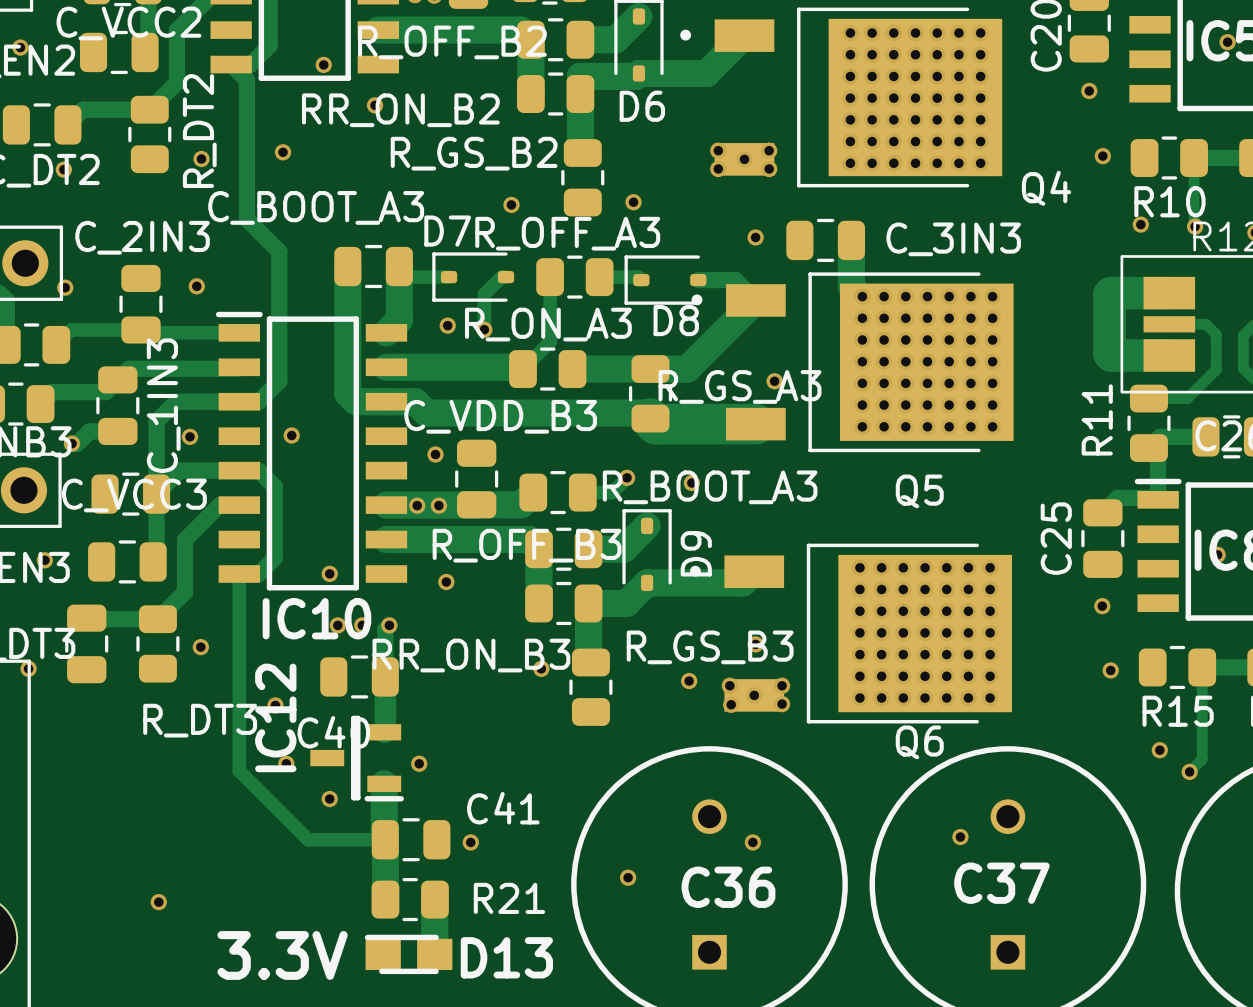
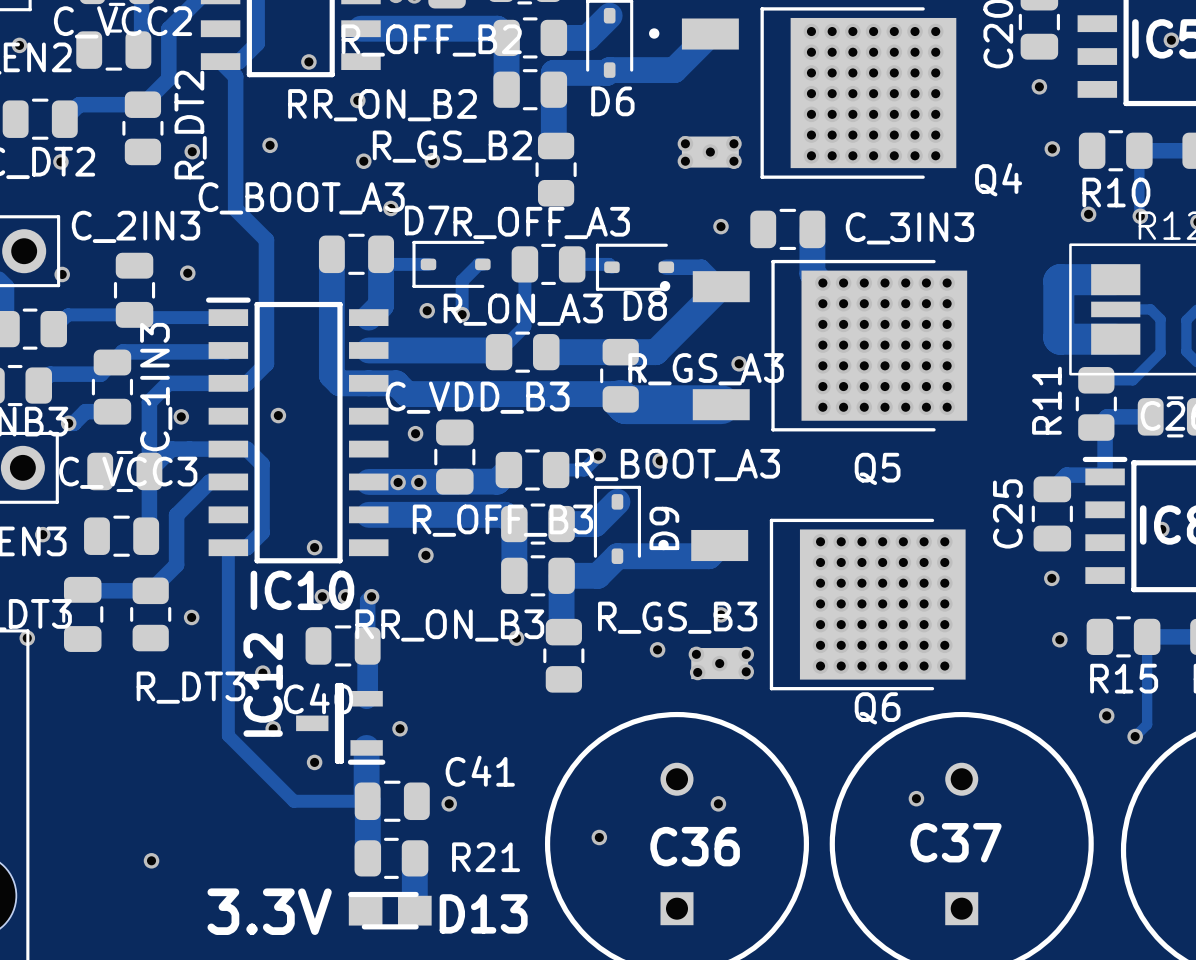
via: none -> (363, 161)
via: none -> (432, 160)
via: (633, 202) -> none
via: (511, 204) -> none
via: none -> (390, 208)

